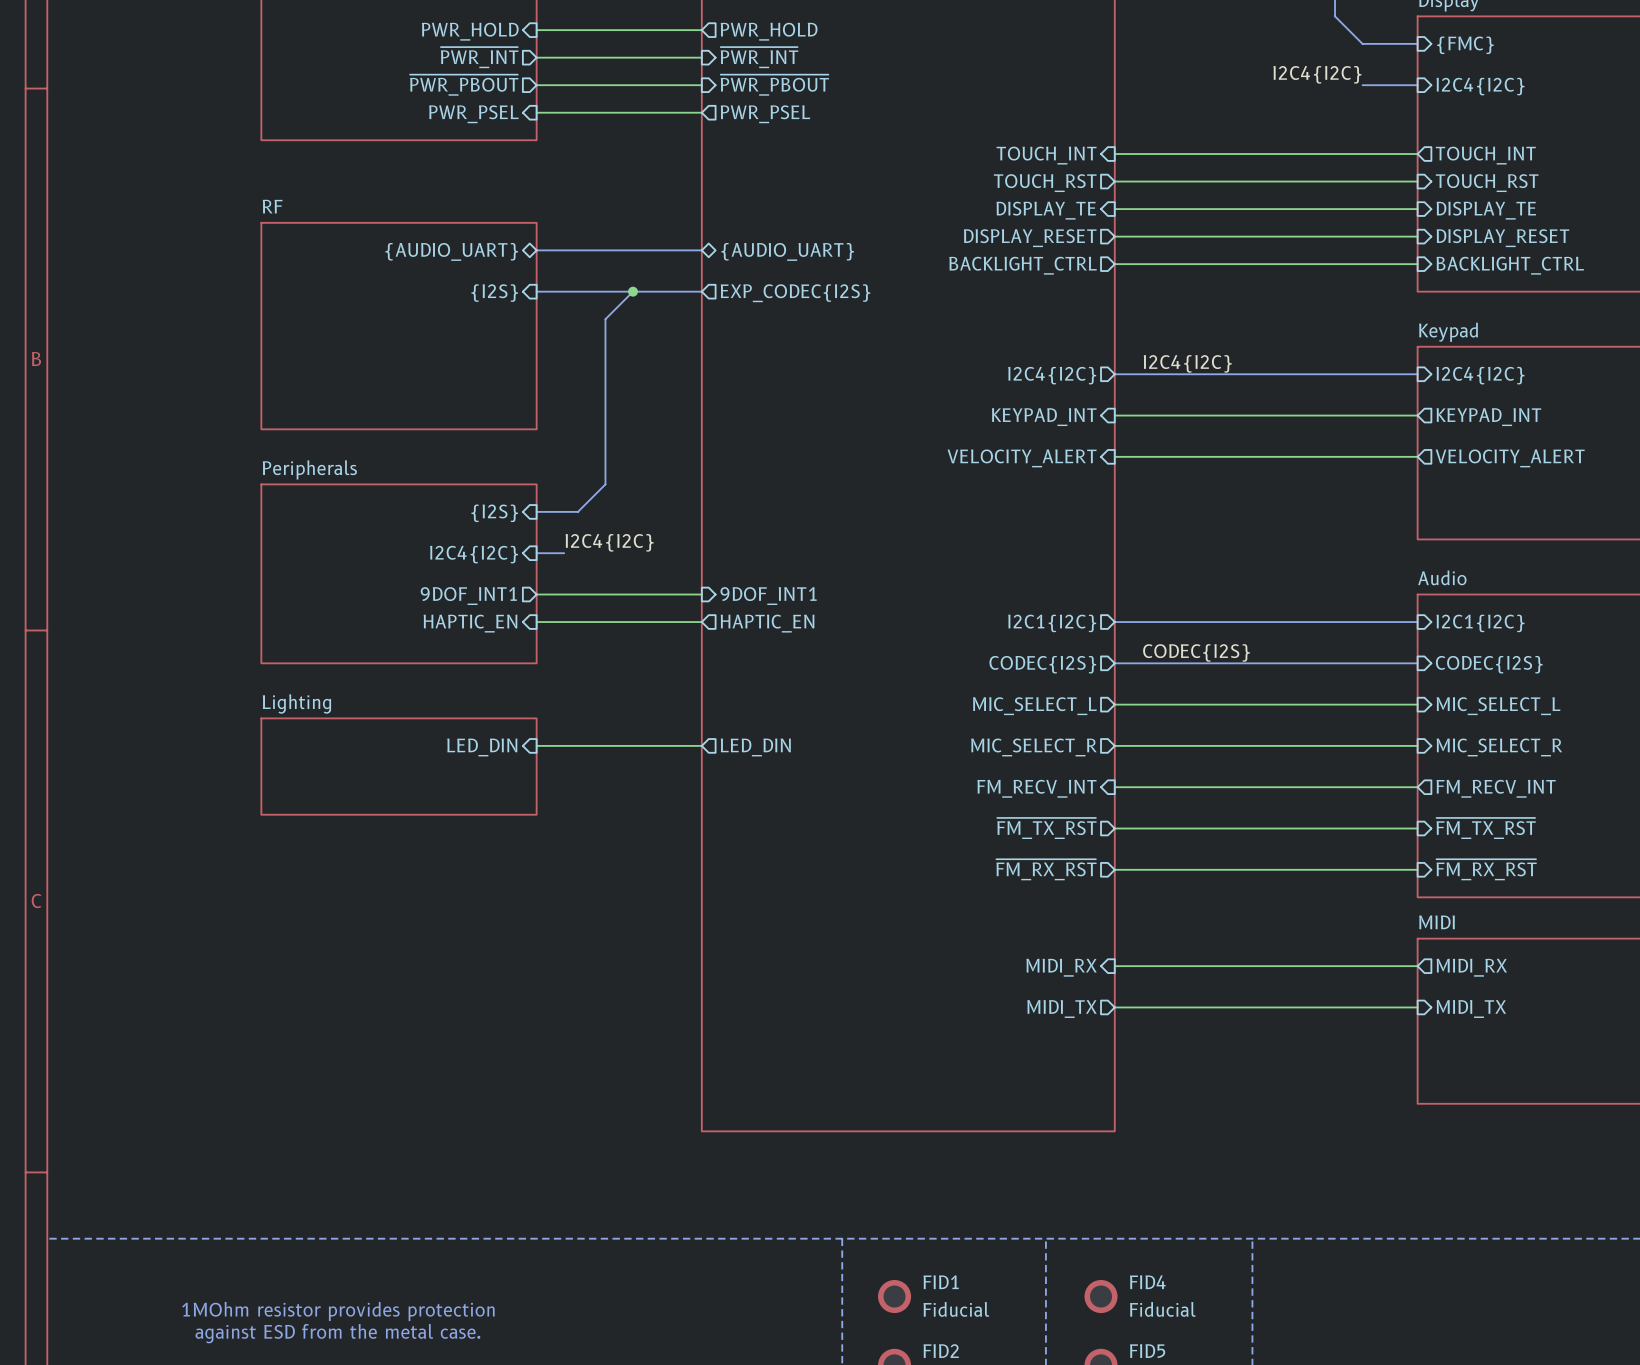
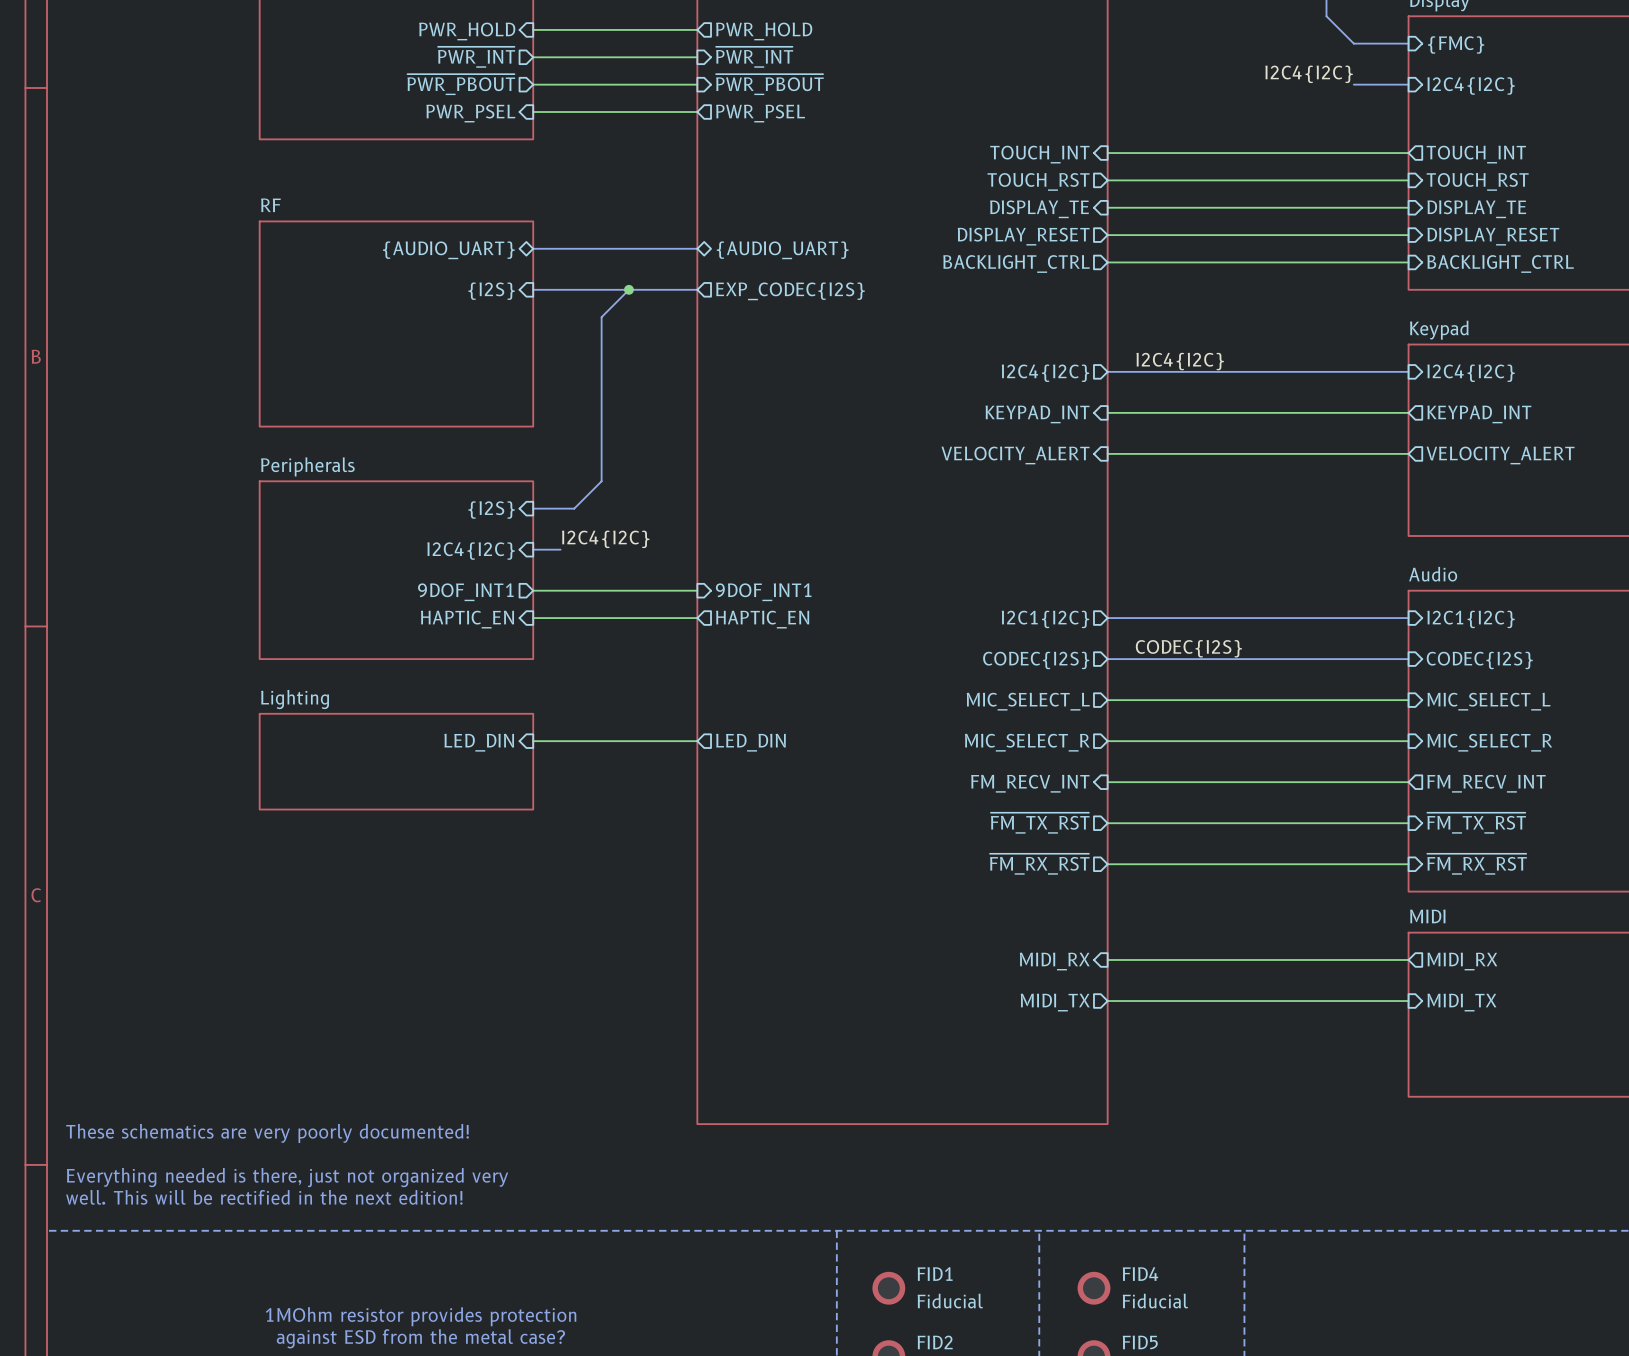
text: none -> These schematics are very poorly documented! (267, 1133)
text: none -> Everything needed is there, just not organized very (287, 1177)
text: none -> well. This will be rectified in the next edition! (264, 1197)
text position: 1MOhm resistor provides protection (338, 1311) -> 1MOhm resistor provides protection (421, 1316)
text: against ESD from the metal case. (337, 1333) -> against ESD from the metal case? (420, 1338)

